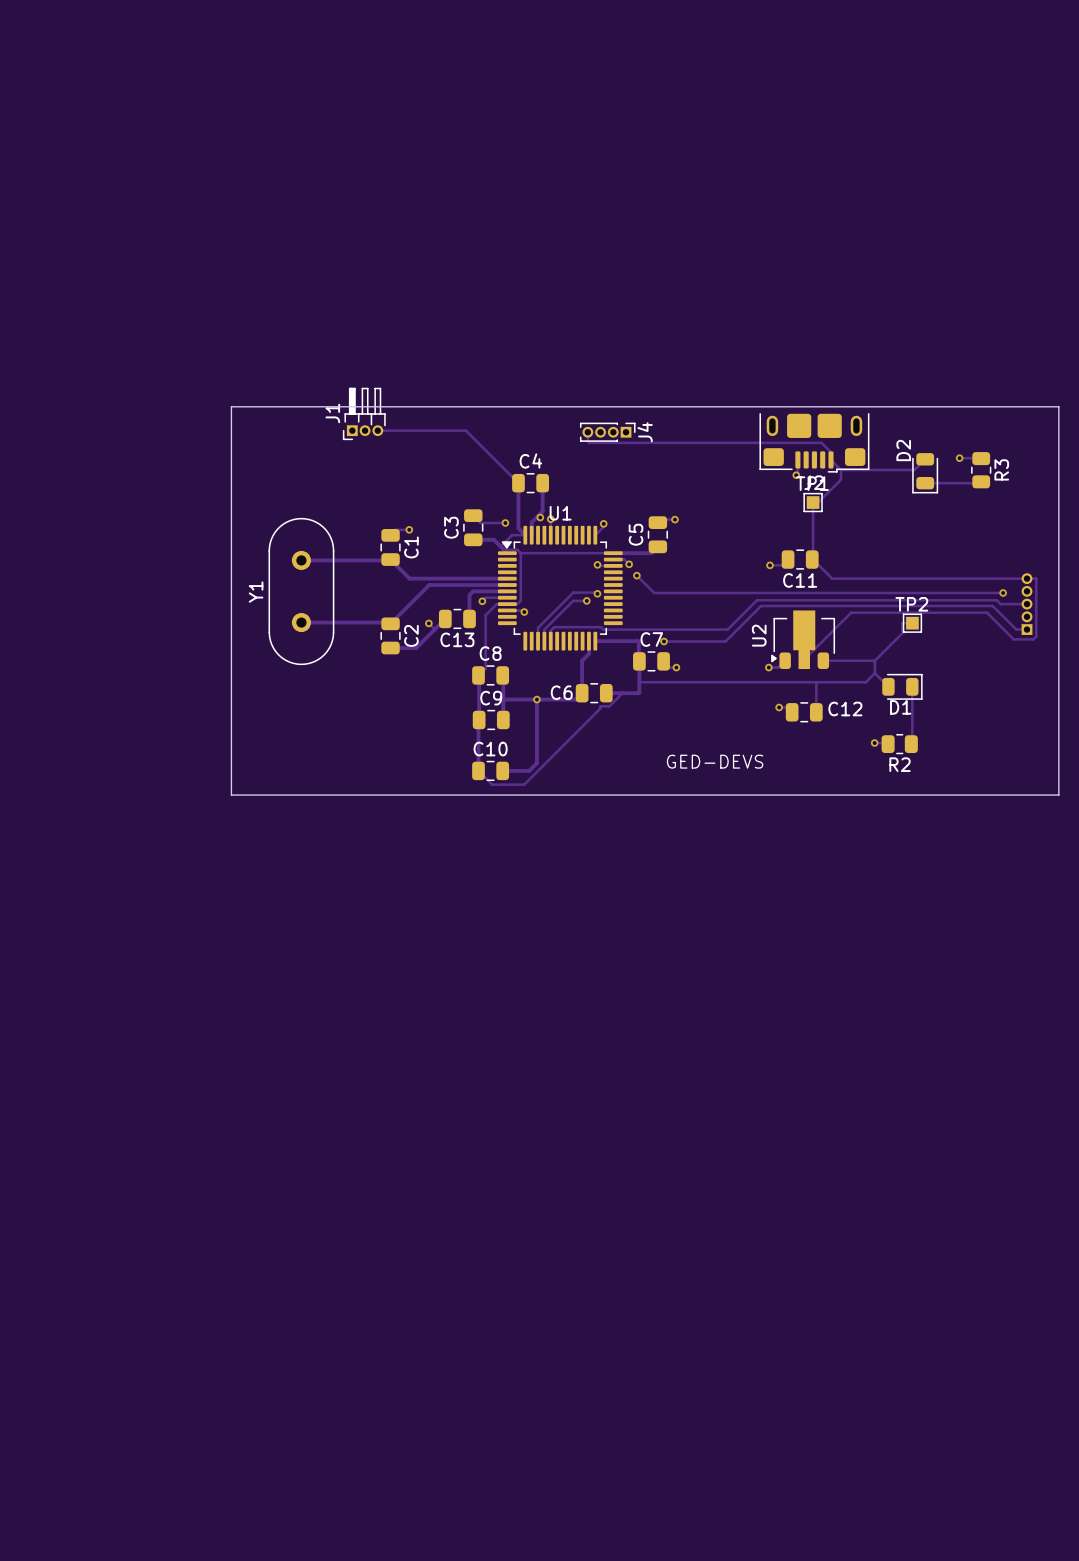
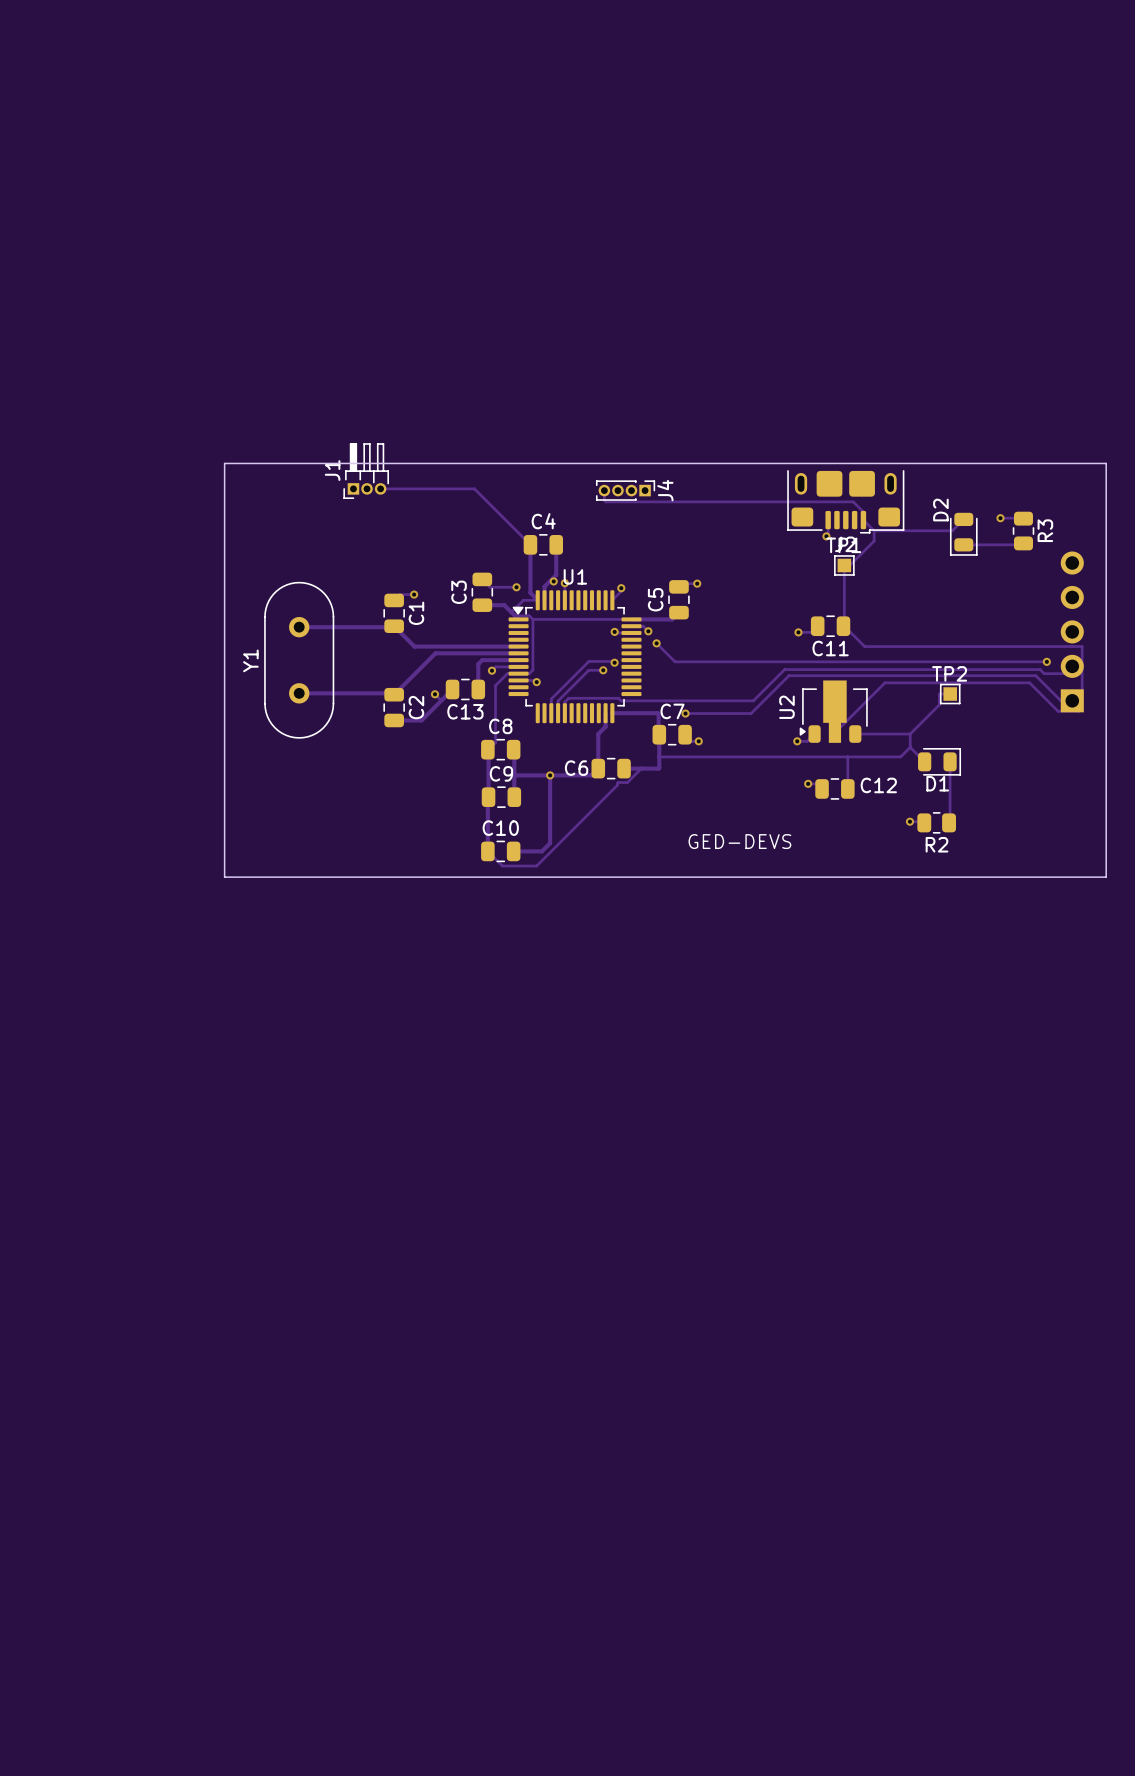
part: none -> (1072, 631)
part: (1027, 604) -> none

